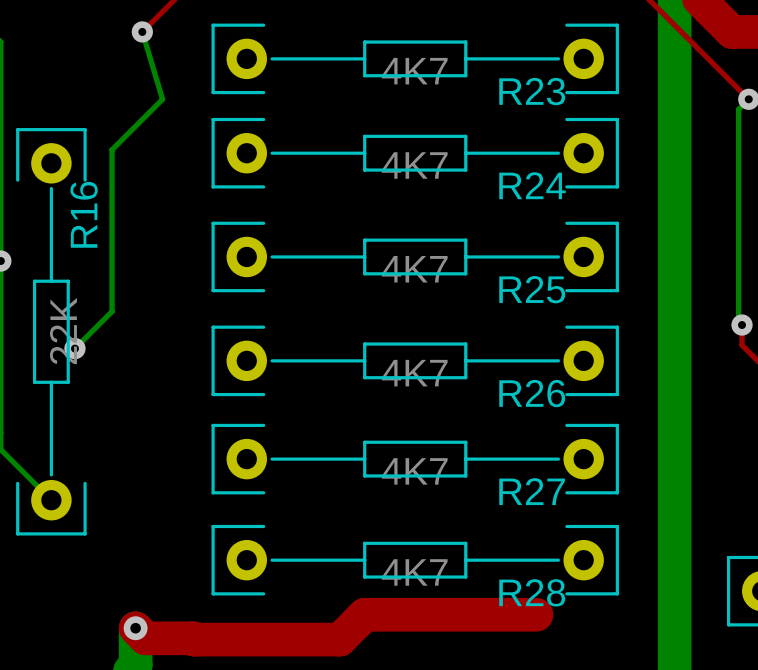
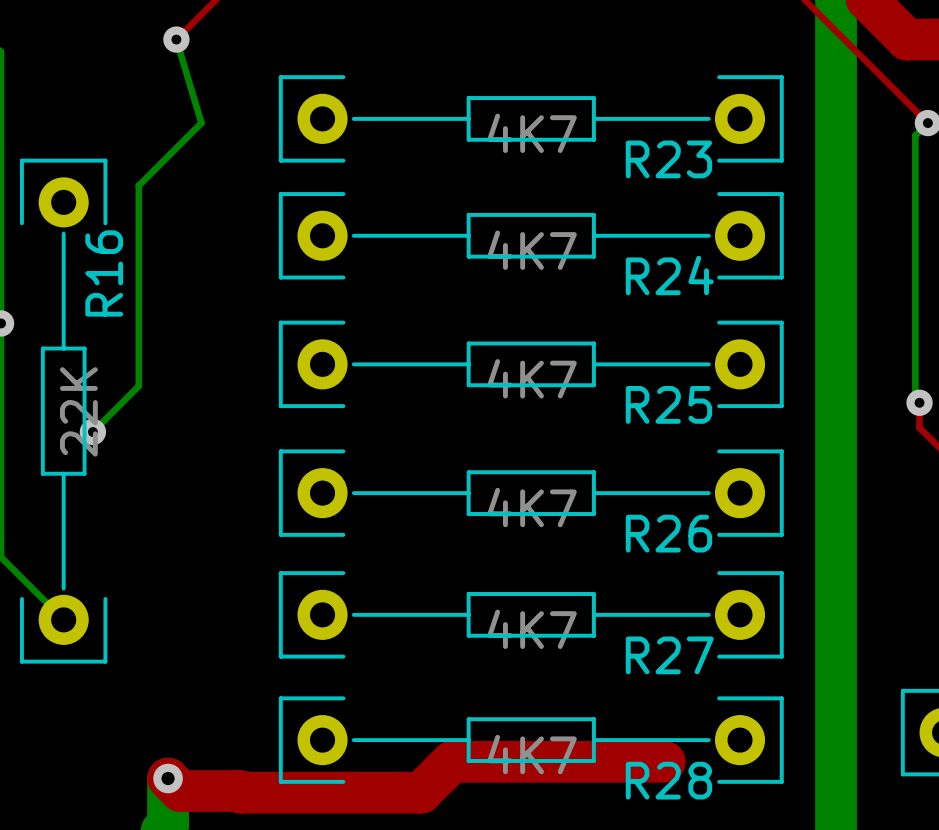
R23 position: (415, 58) -> (531, 118)
R24 position: (415, 153) -> (531, 235)
R25 position: (415, 256) -> (531, 364)
R26 position: (415, 360) -> (531, 493)
R27 position: (415, 459) -> (531, 614)
R28 position: (415, 560) -> (531, 740)

